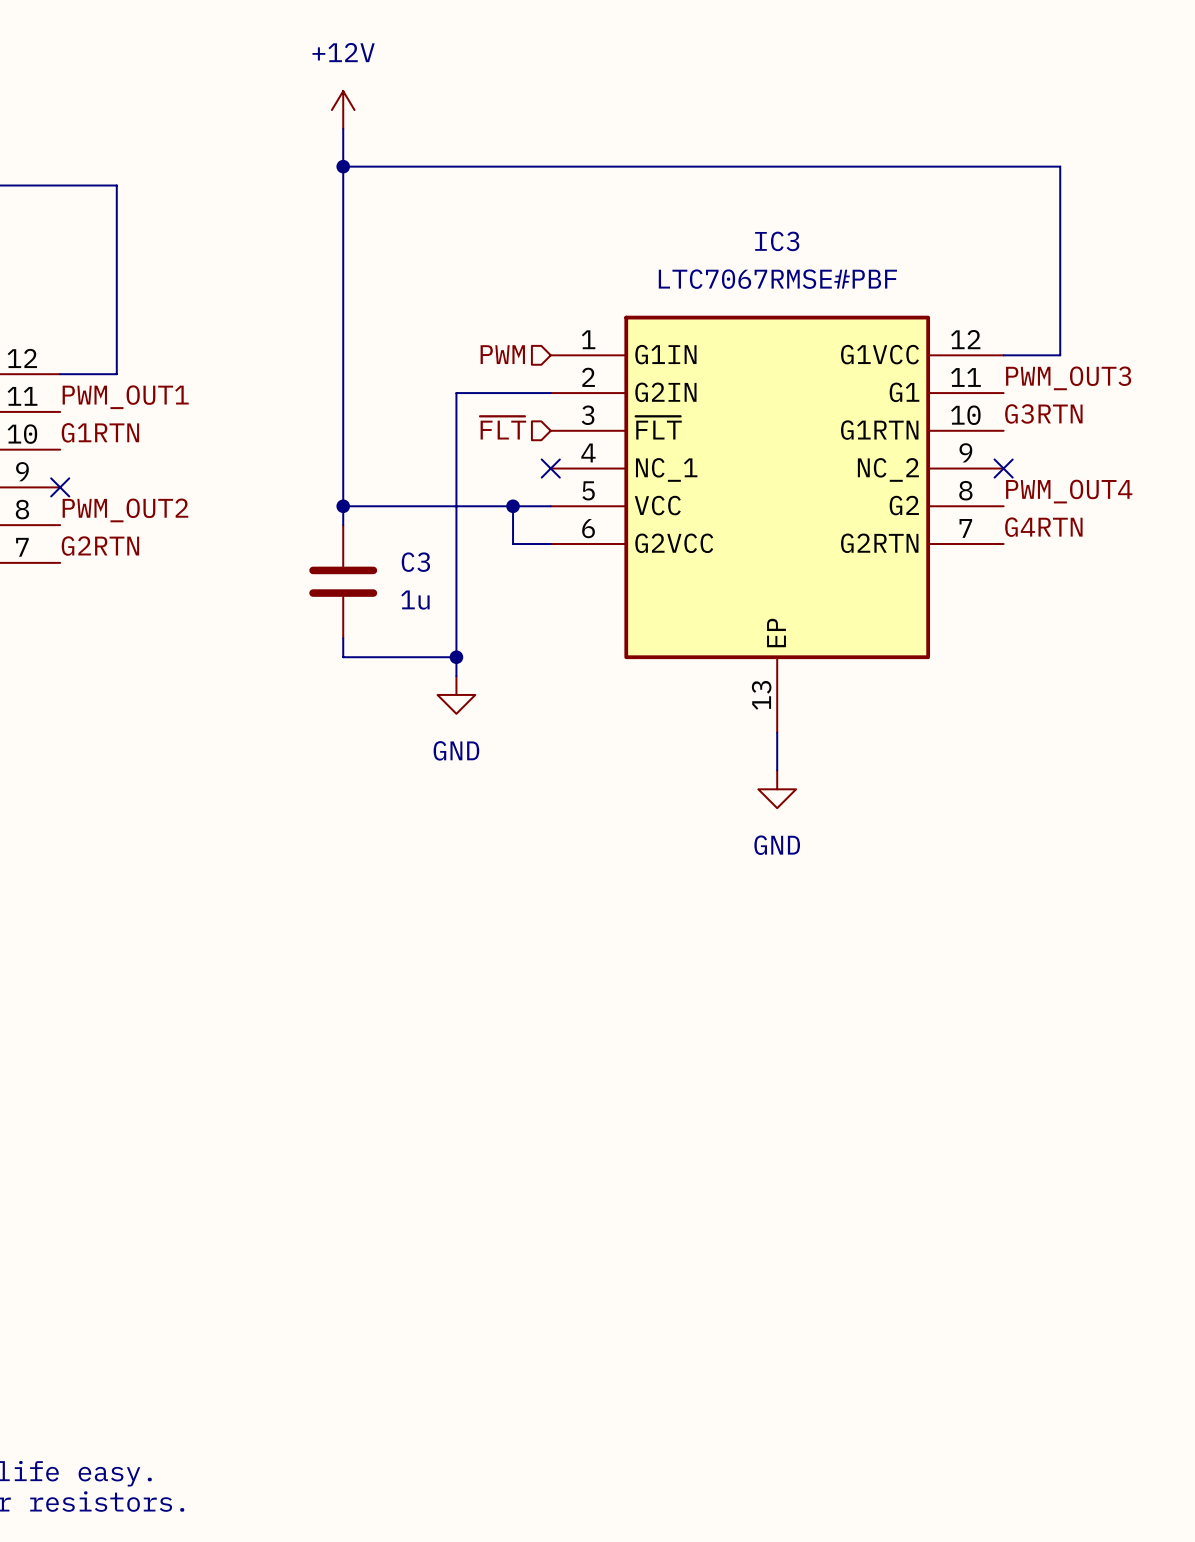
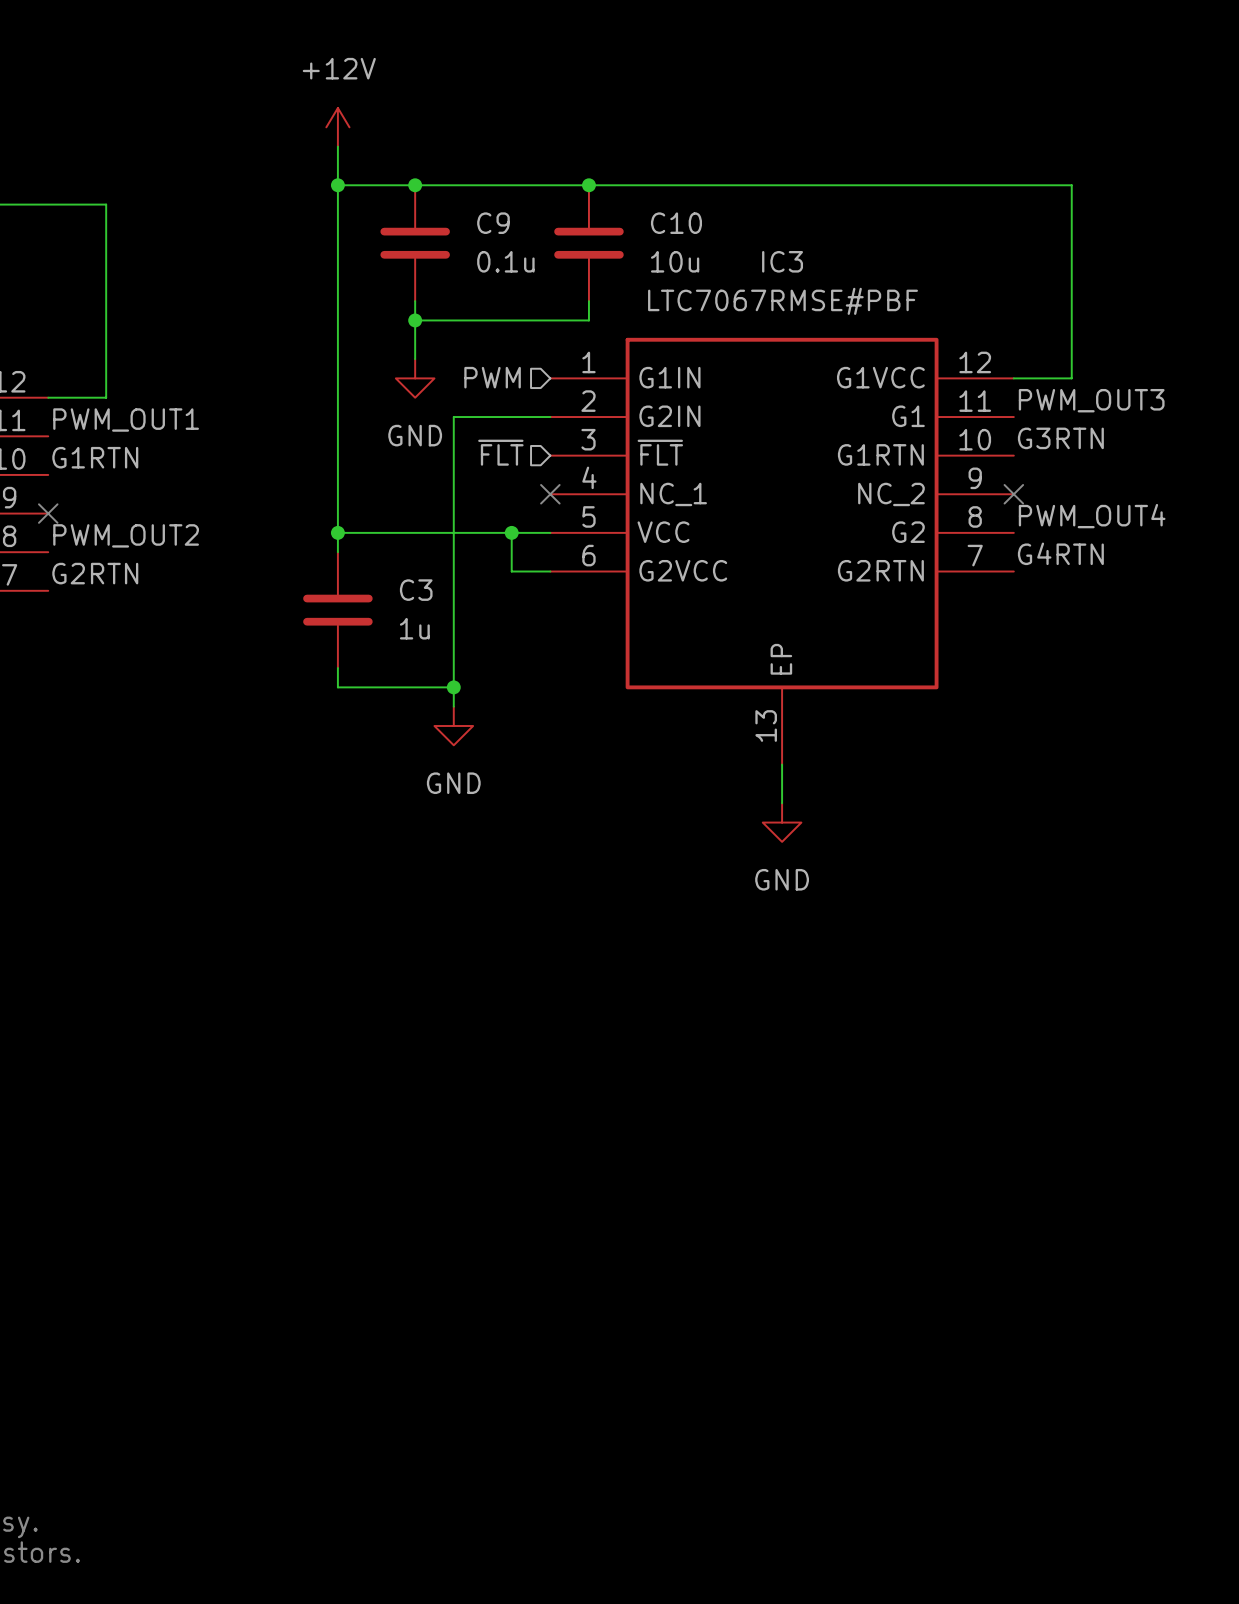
junction: none -> (415, 185)
junction: none -> (588, 185)
C9: none -> 0.1u (415, 243)
C10: none -> 10u (588, 243)
wire: none -> (415, 301) (415, 359)
wire: none -> (588, 301) (588, 320) (415, 320)
junction: none -> (415, 320)
power symbol: none -> GND (415, 378)

